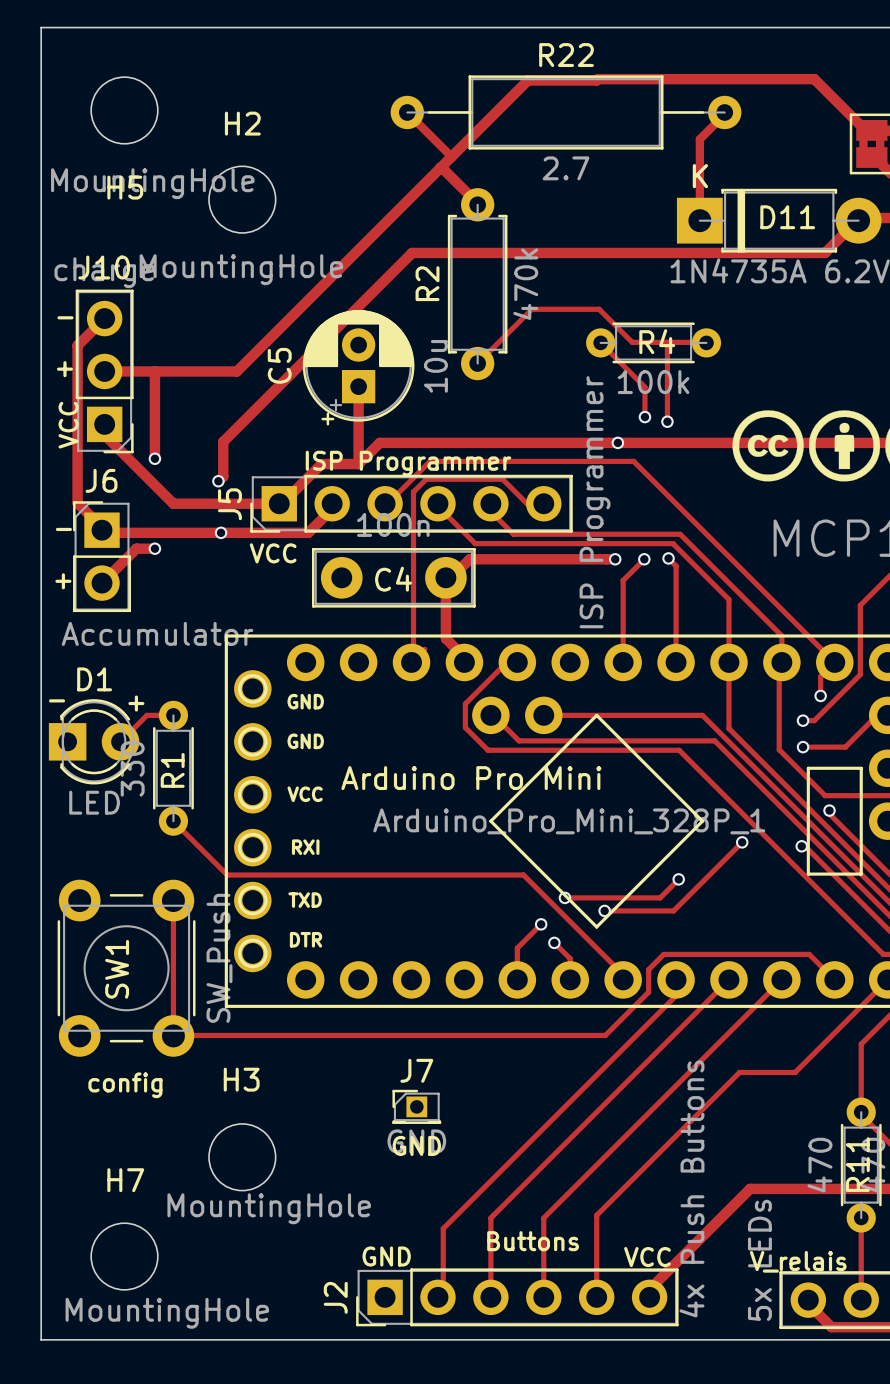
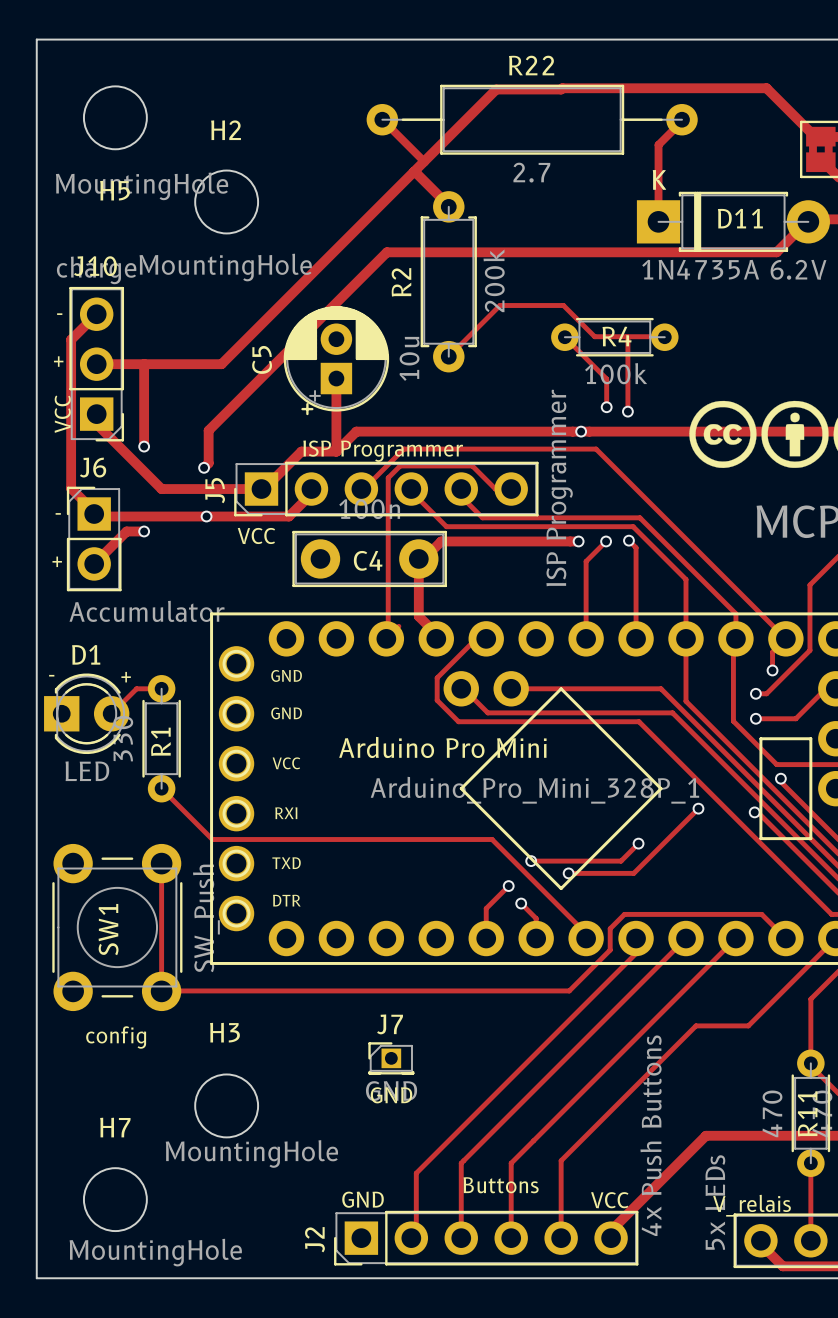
R2 value: 470k (525, 284) -> 200k (494, 280)

